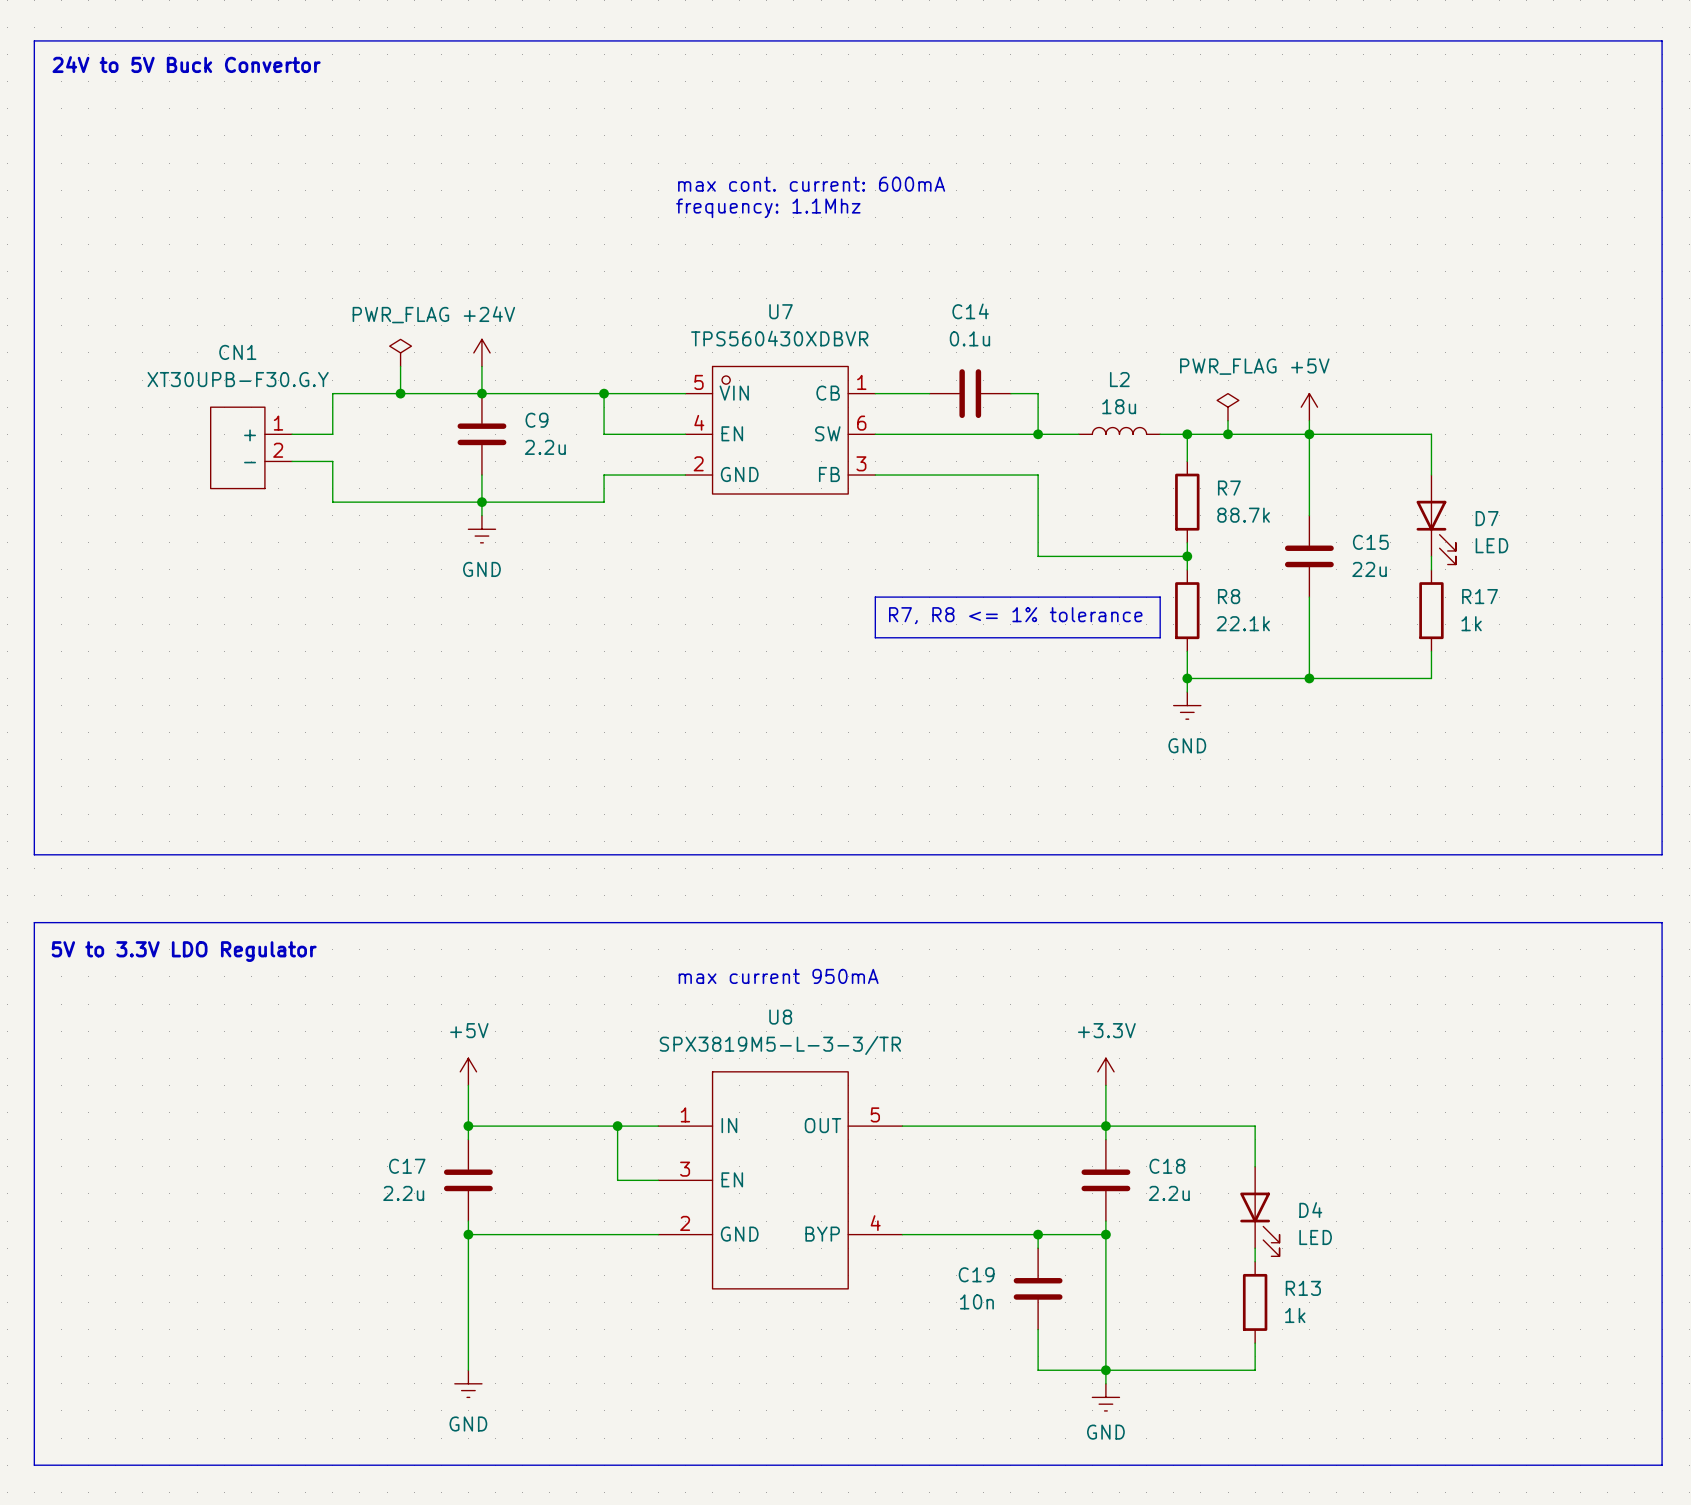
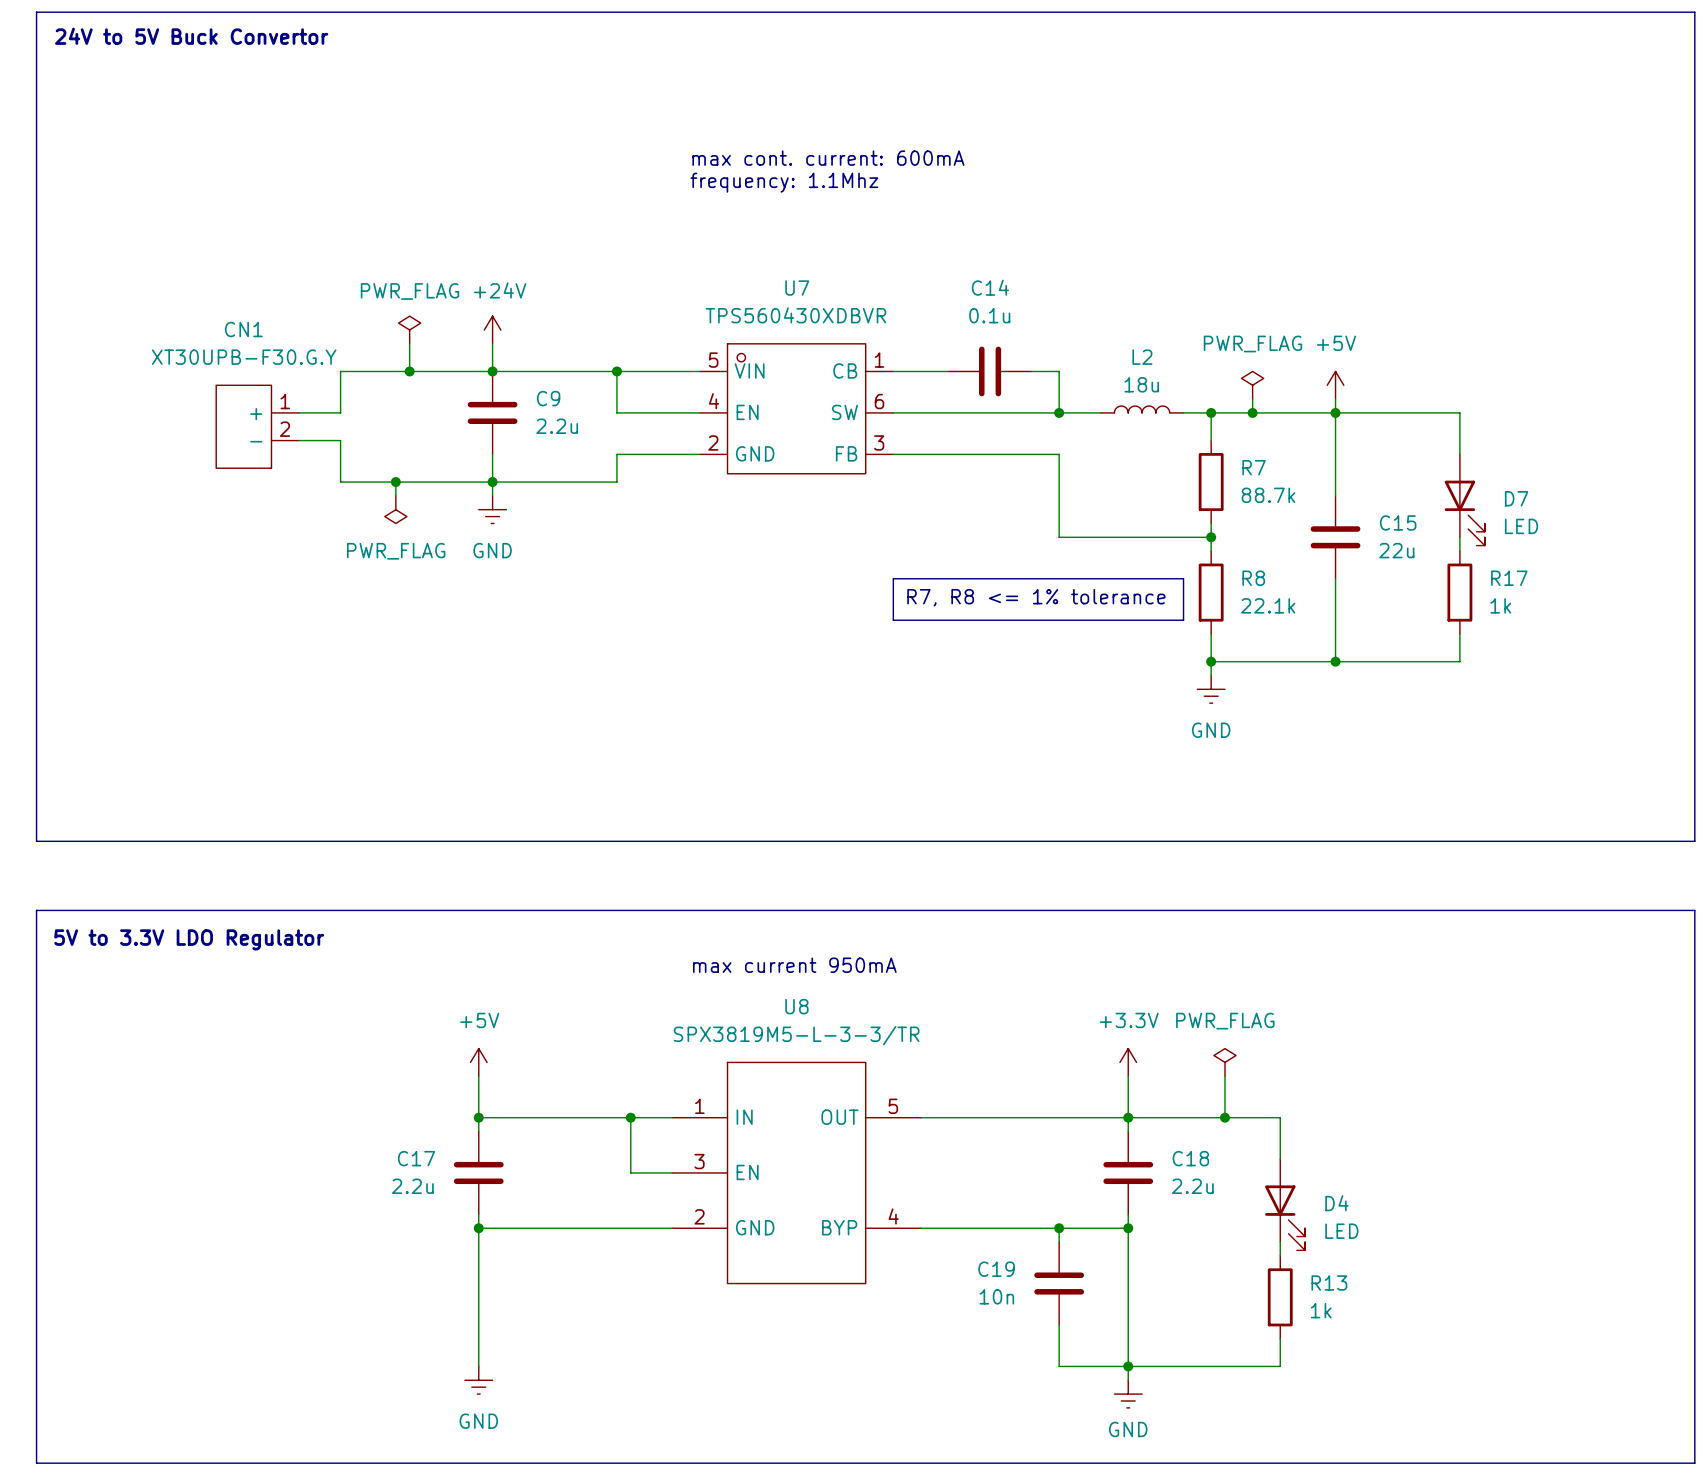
wire: none -> (395, 482) (395, 495)
junction: none -> (395, 482)
power symbol: none -> PWR_FLAG (395, 509)
power symbol: none -> PWR_FLAG (1224, 1062)
wire: none -> (1224, 1076) (1224, 1117)
junction: none -> (1224, 1117)

